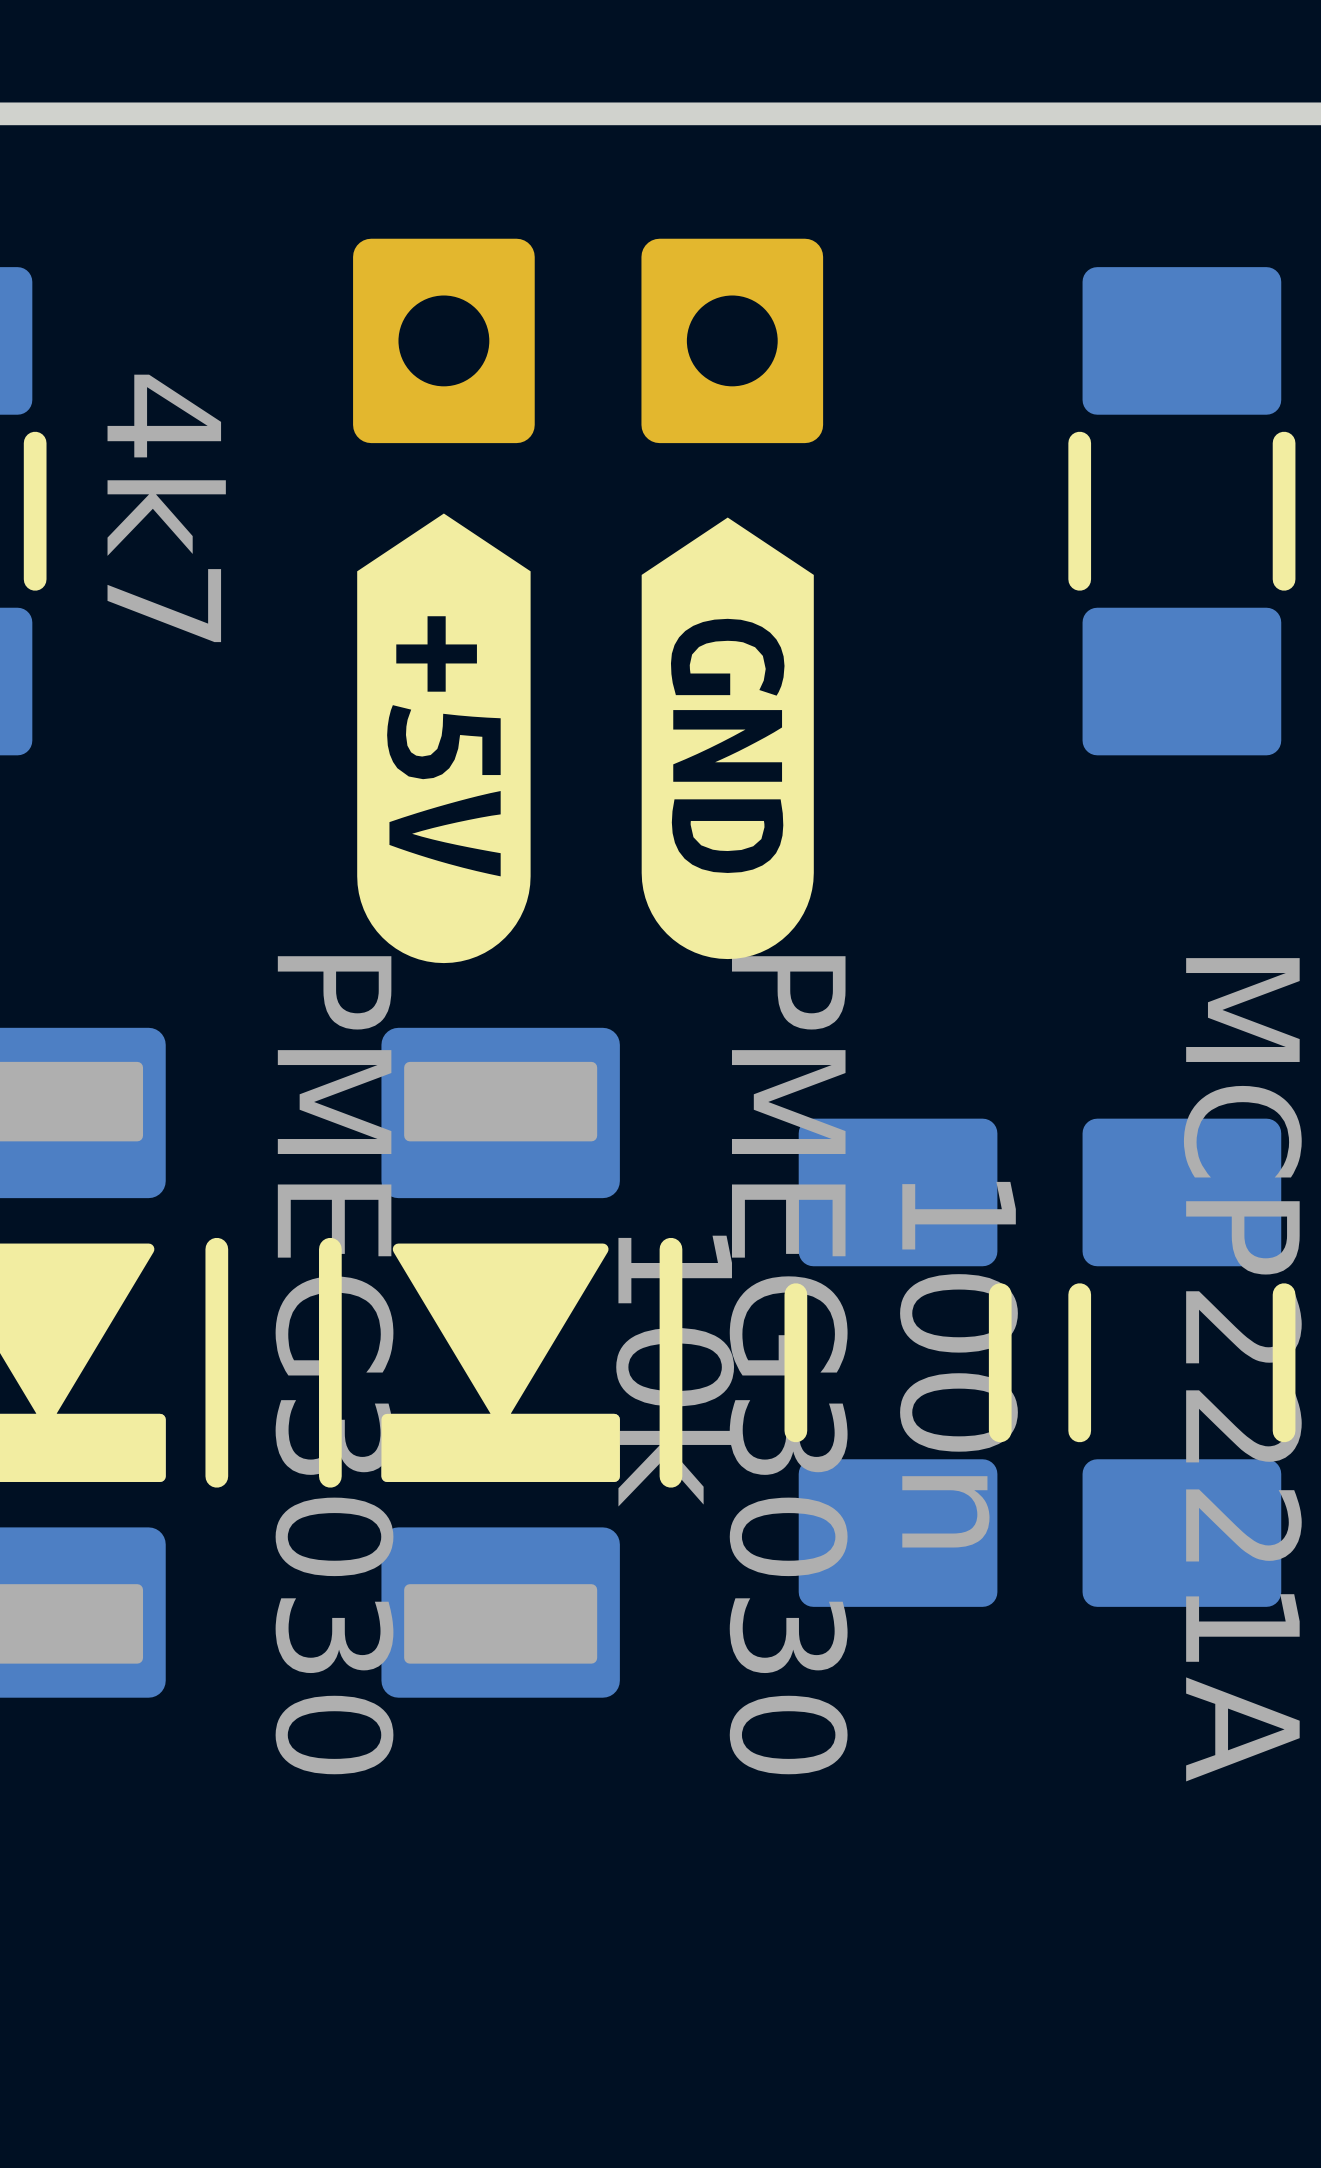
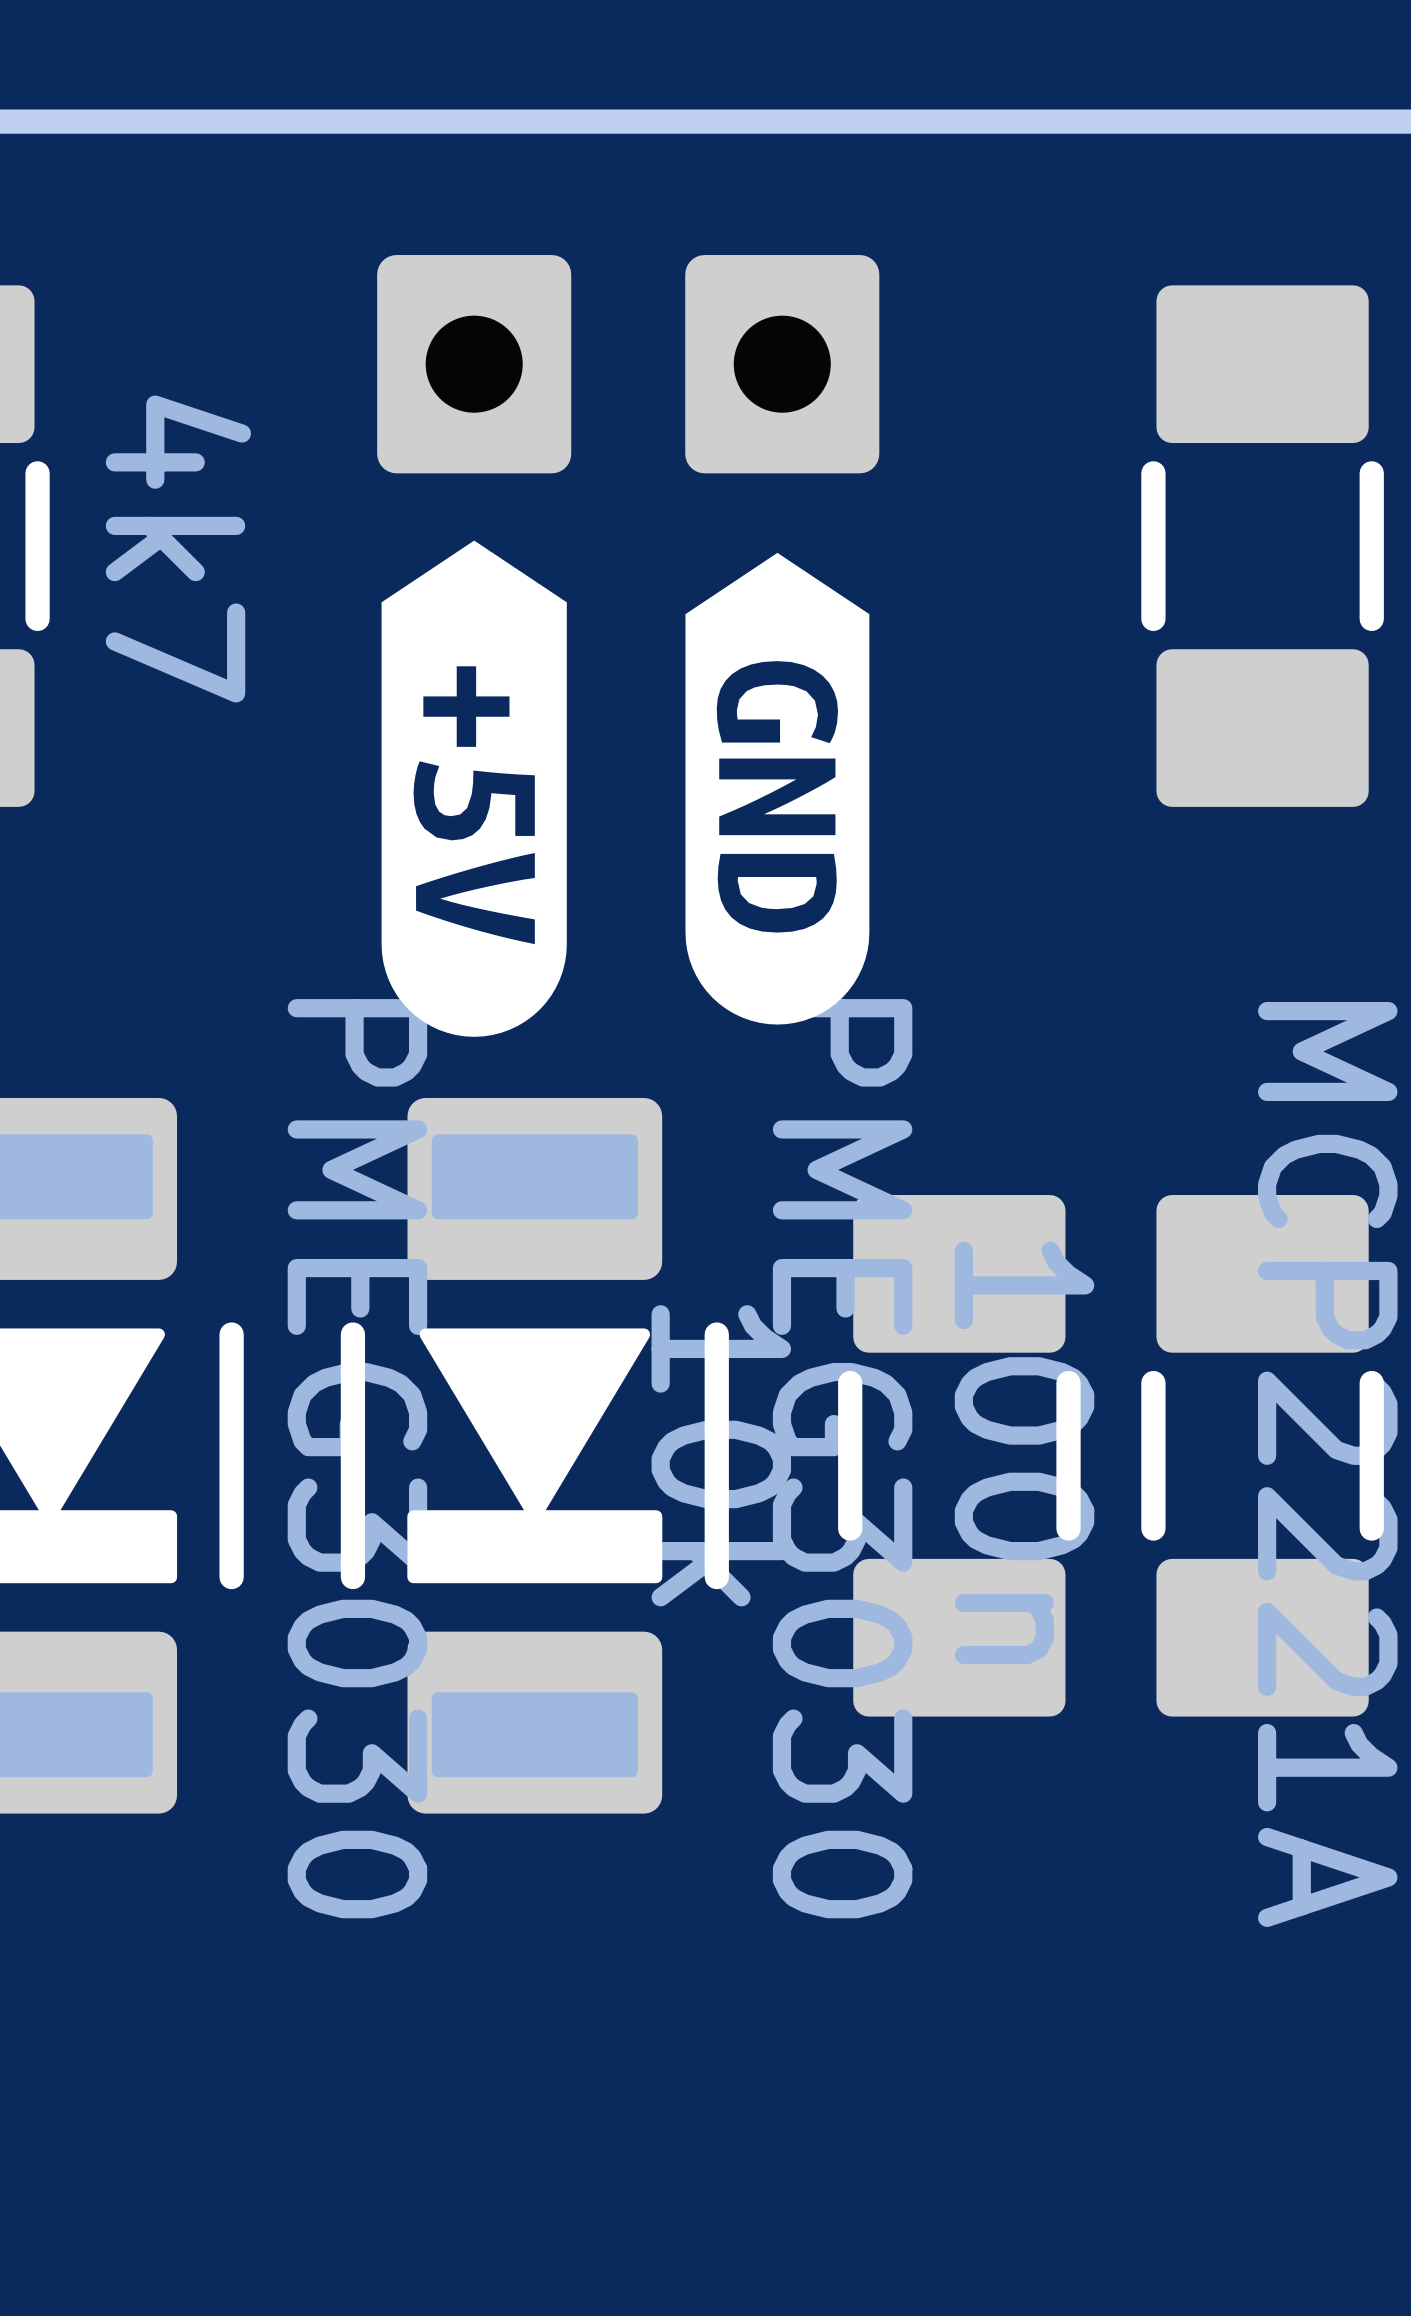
drawing shape: [357, 513, 531, 964] -> [381, 540, 567, 1037]

